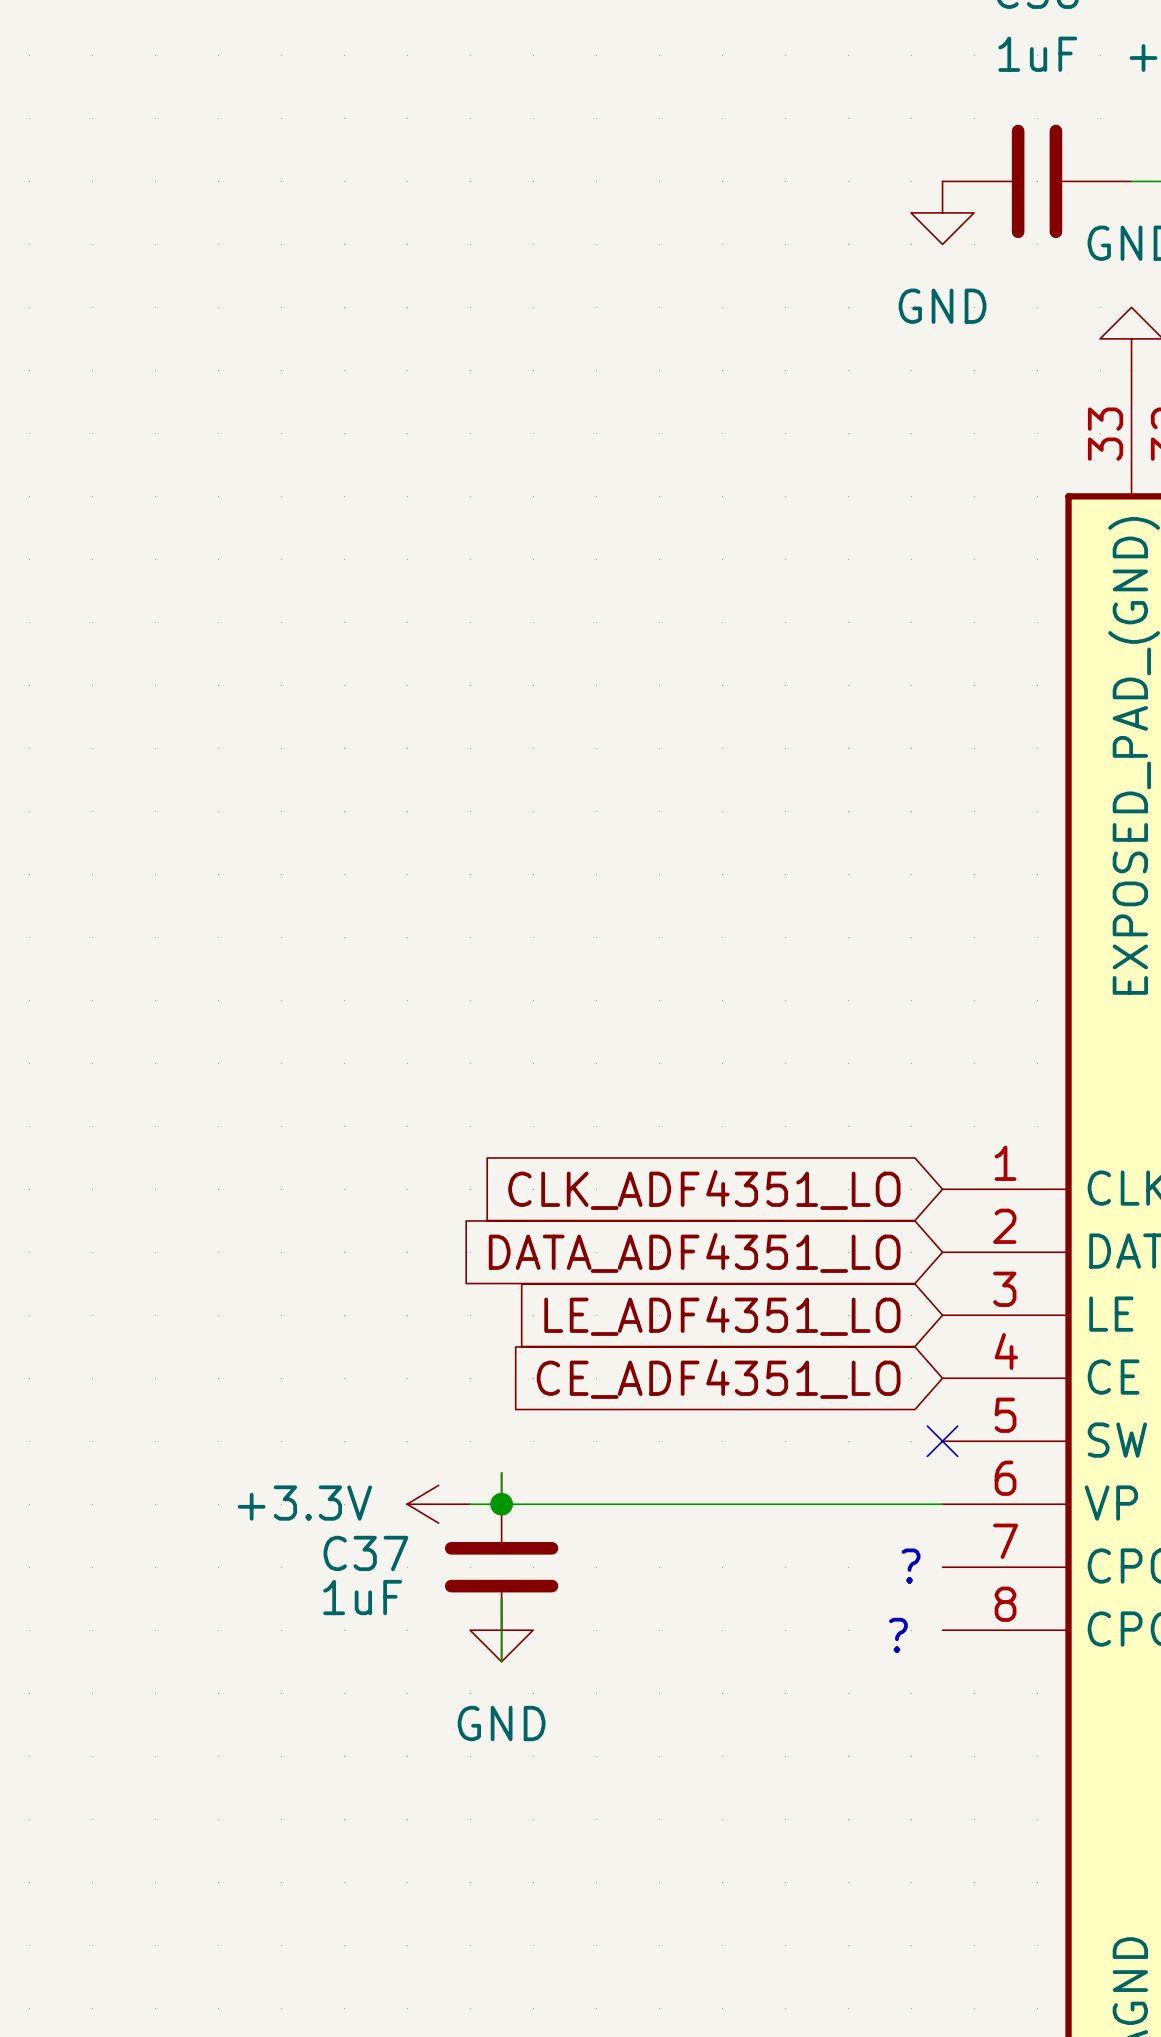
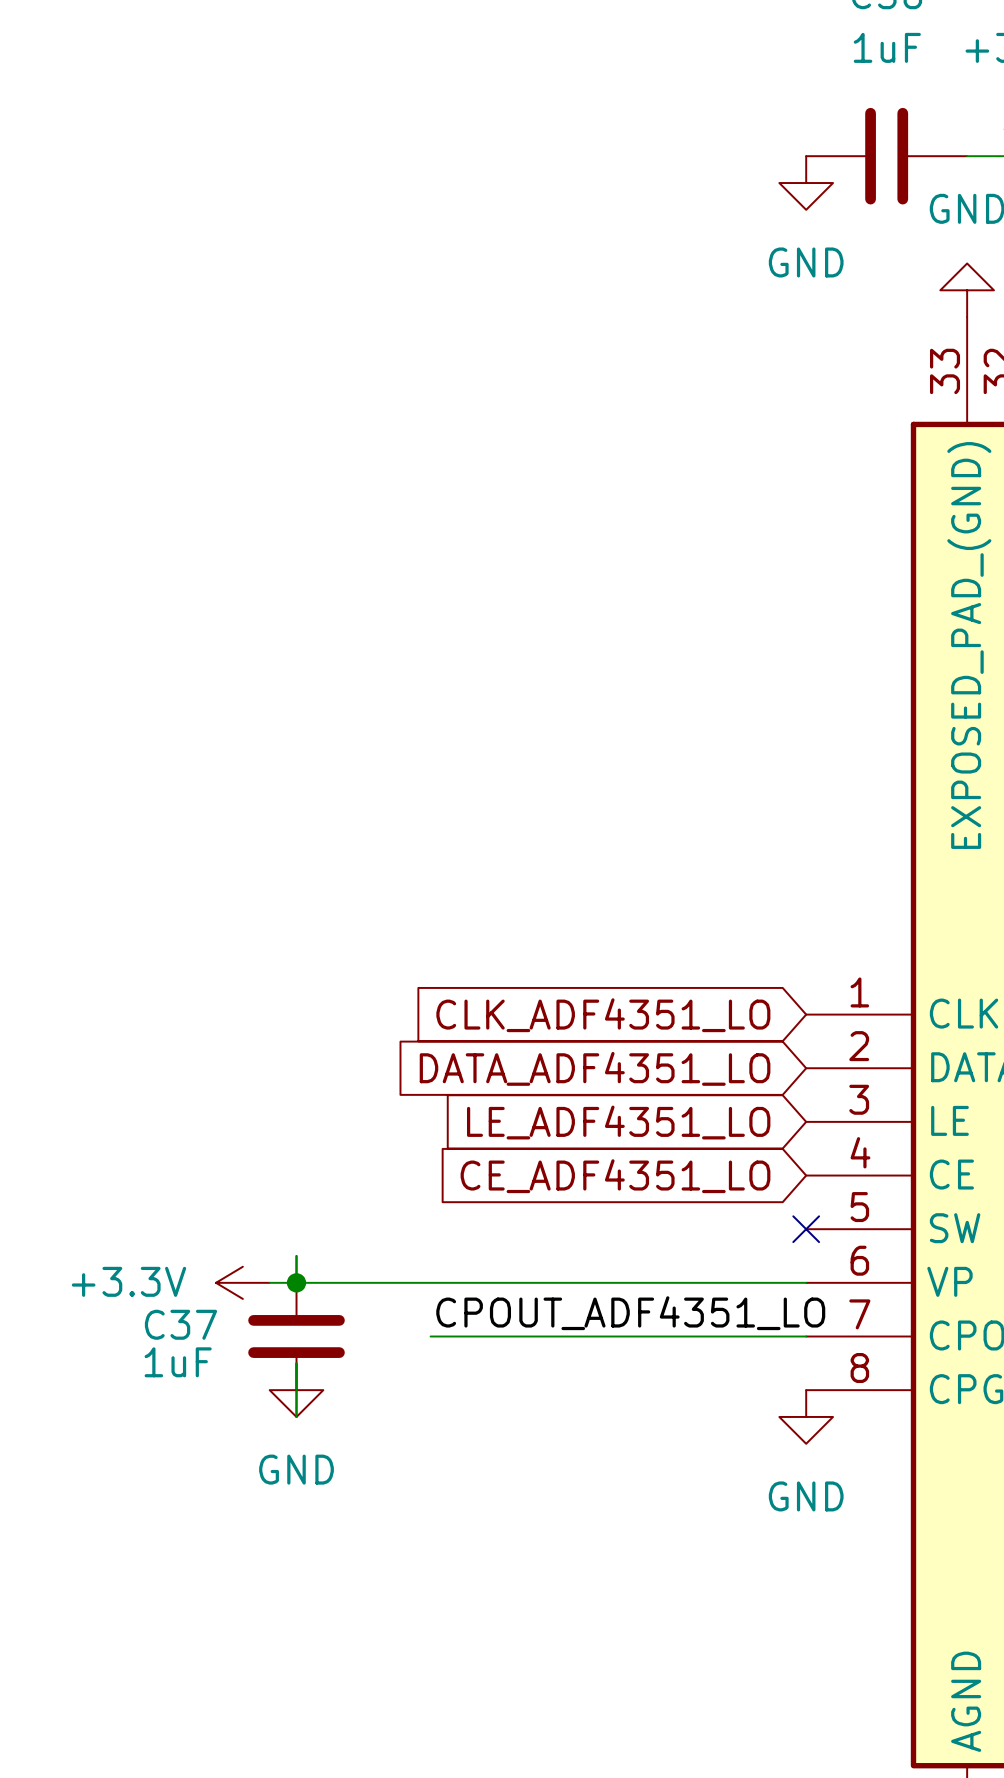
wire: (501, 1472) (501, 1504) -> (296, 1256) (296, 1282)
wire: none -> (269, 1282) (403, 1282)
junction: none -> (296, 1282)
power symbol position: +3.3V (438, 1504) -> +3.3V (242, 1282)
junction: (501, 1504) -> none
label: none -> CPOUT_ADF4351_LO (630, 1313)
text: ? (911, 1566) -> none
wire: none -> (430, 1336) (806, 1336)
C37 position: (501, 1567) -> (296, 1336)
wire: (501, 1598) (501, 1661) -> (296, 1363) (296, 1416)
power symbol position: GND (501, 1630) -> GND (296, 1390)
text: ? (898, 1635) -> none
power symbol: none -> GND (806, 1416)

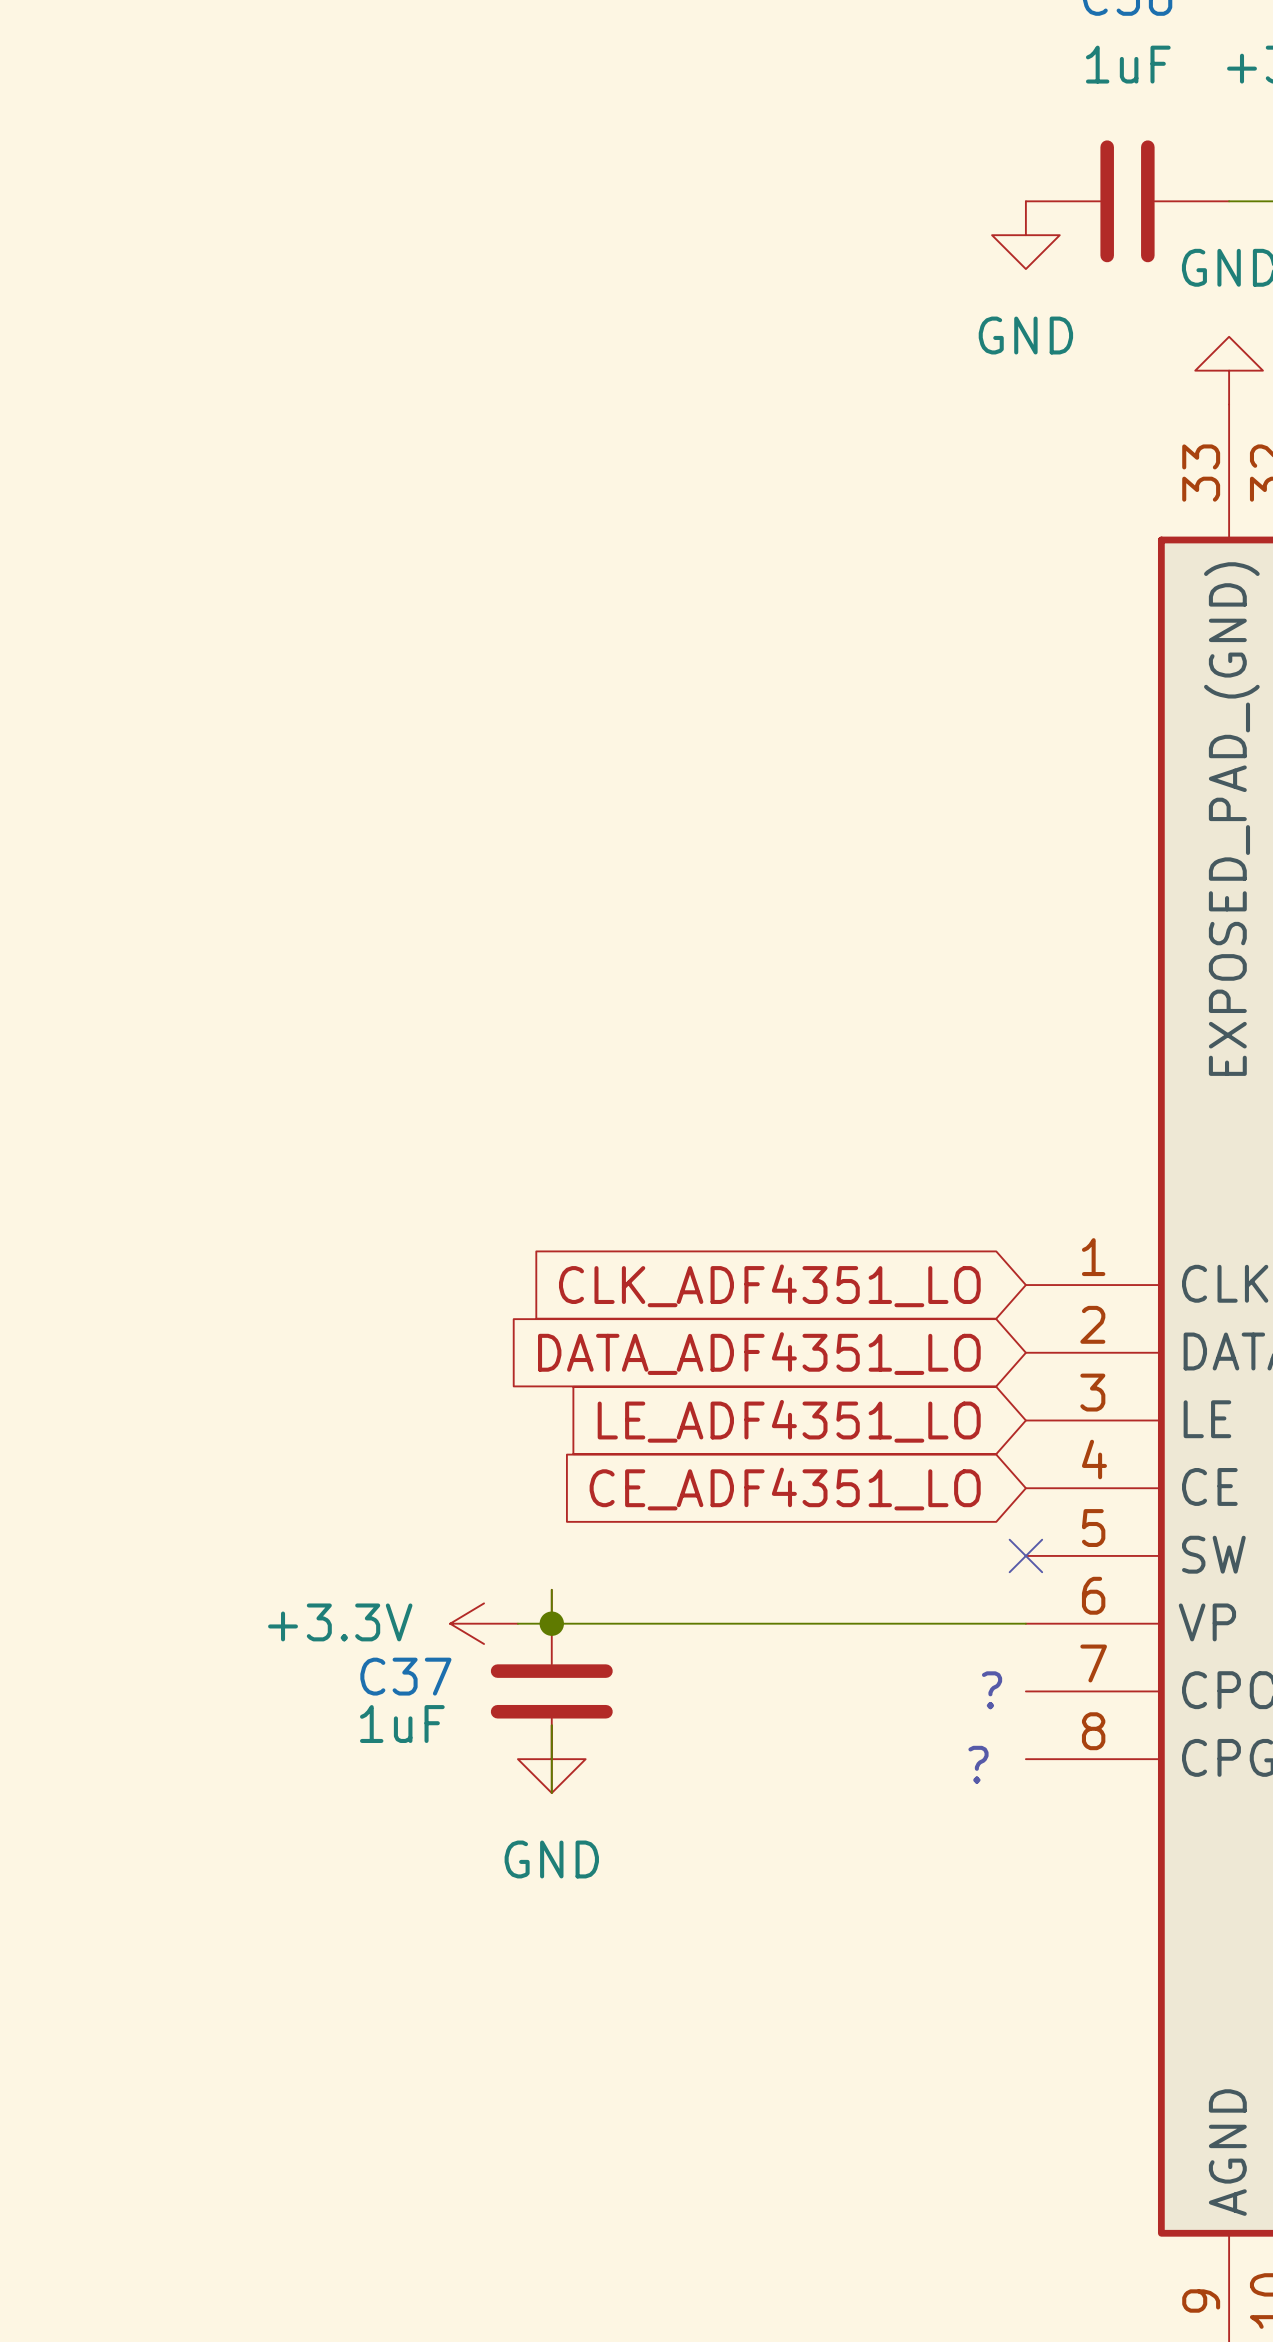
wire: (296, 1256) (296, 1282) -> (551, 1589) (551, 1623)
power symbol position: +3.3V (242, 1282) -> +3.3V (484, 1623)
wire: (269, 1282) (403, 1282) -> none
junction: (296, 1282) -> none
junction: none -> (551, 1623)
label: CPOUT_ADF4351_LO (630, 1313) -> none
text: none -> ? (992, 1690)
C37 position: (296, 1336) -> (551, 1691)
wire: (430, 1336) (806, 1336) -> none
wire: (296, 1363) (296, 1416) -> (551, 1725) (551, 1793)
power symbol position: GND (296, 1390) -> GND (551, 1759)
text: none -> ? (978, 1764)
power symbol: GND (806, 1416) -> none

